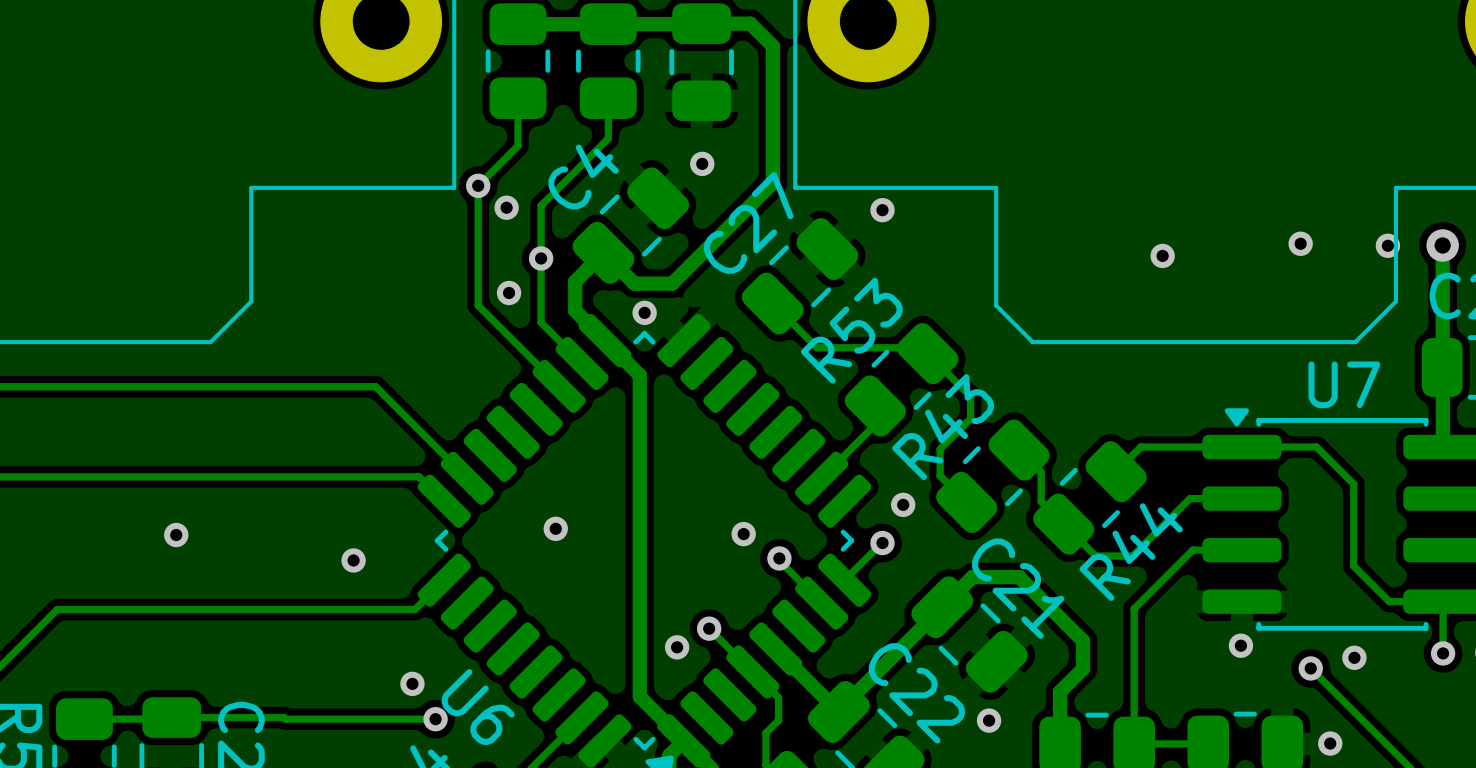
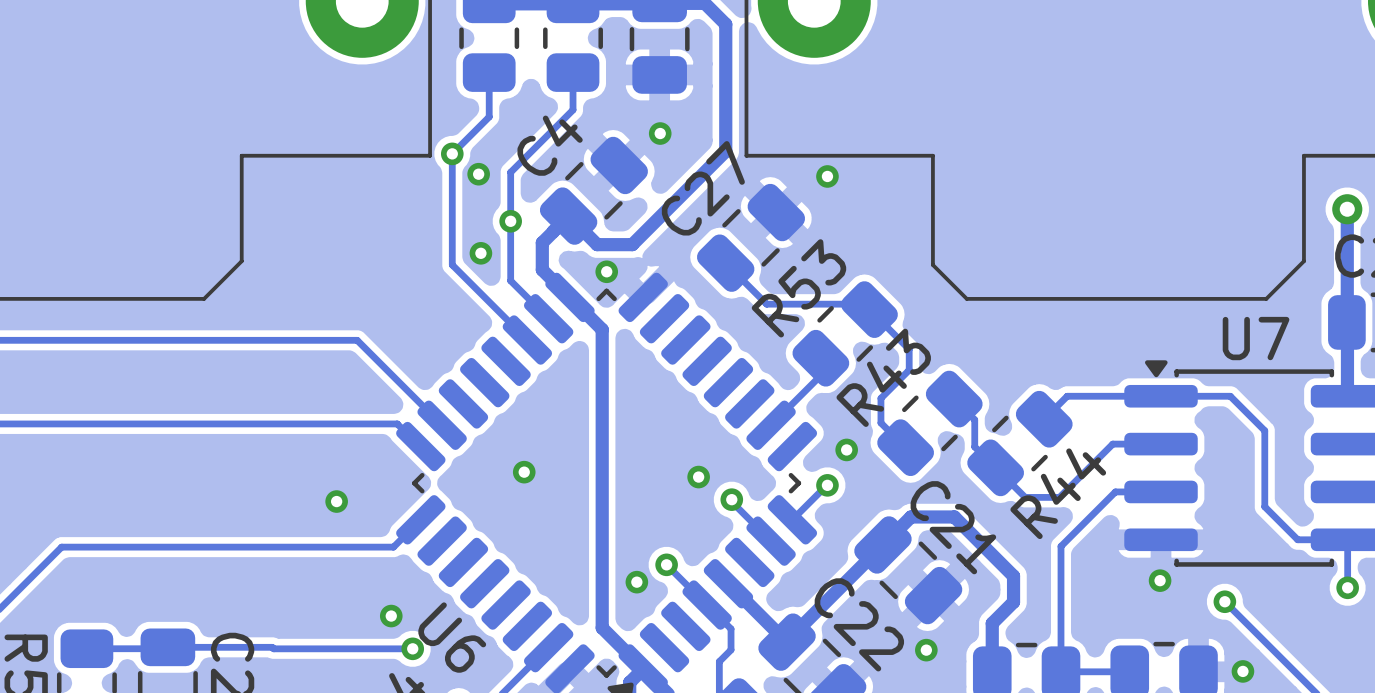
via: (1300, 243) -> none
via: (1387, 245) -> none
via: (1162, 255) -> none
via: (176, 535) -> none
via: (1354, 657) -> none

